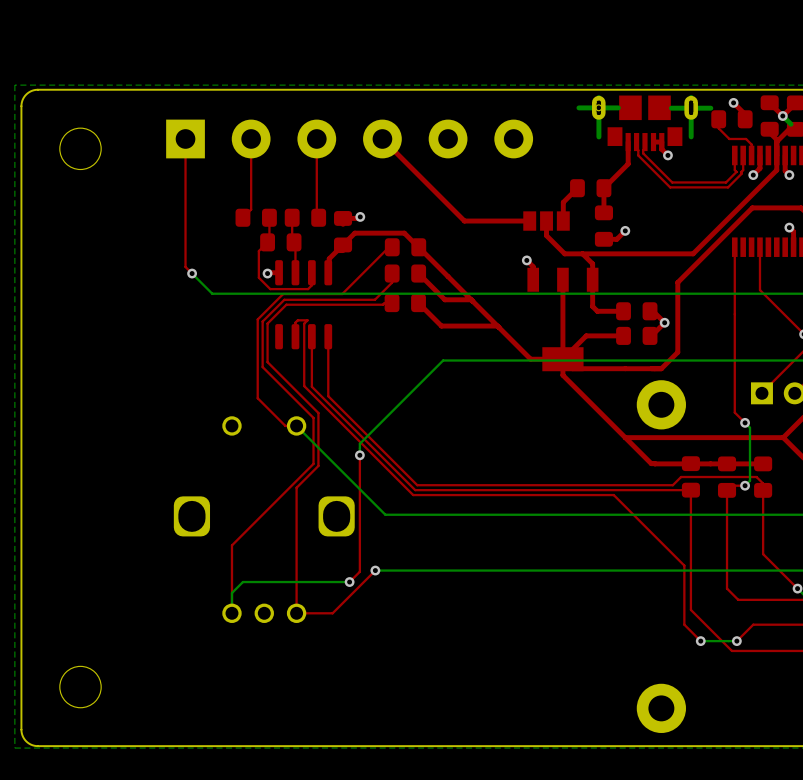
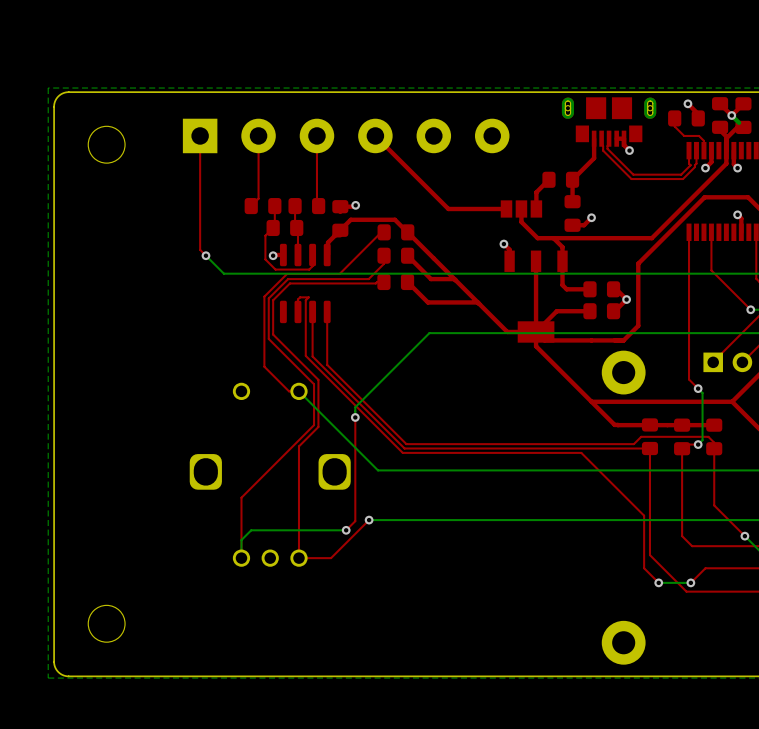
part footprint: [592, 95, 698, 152] -> [561, 97, 657, 147]
bottom track: (598, 97) (598, 136) -> none
bottom track: (691, 97) (691, 136) -> none
bottom track: (618, 107) (578, 107) -> none
bottom track: (710, 108) (671, 108) -> none

